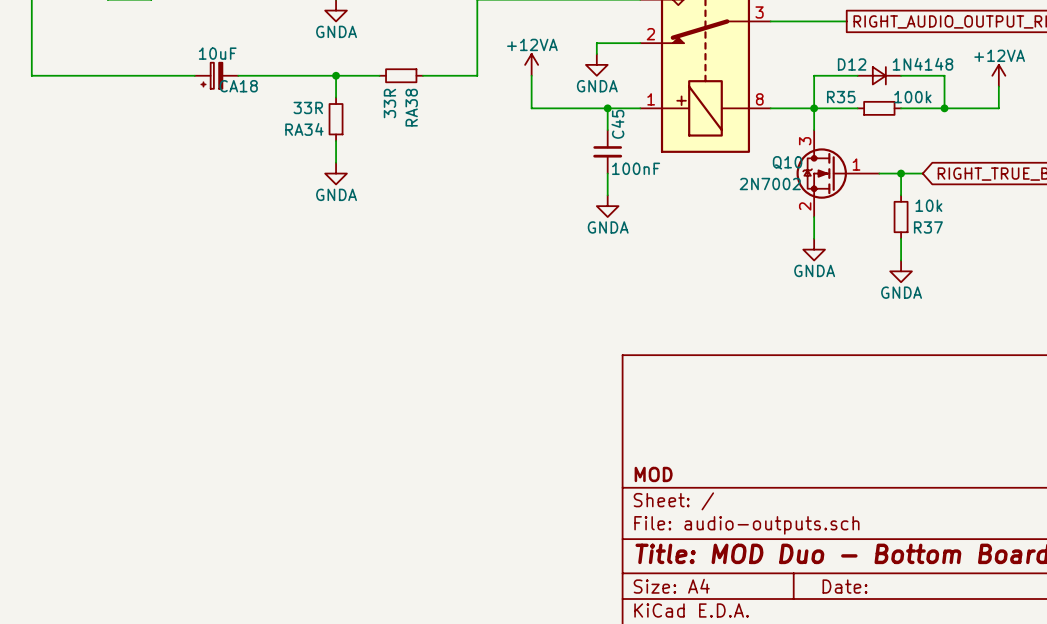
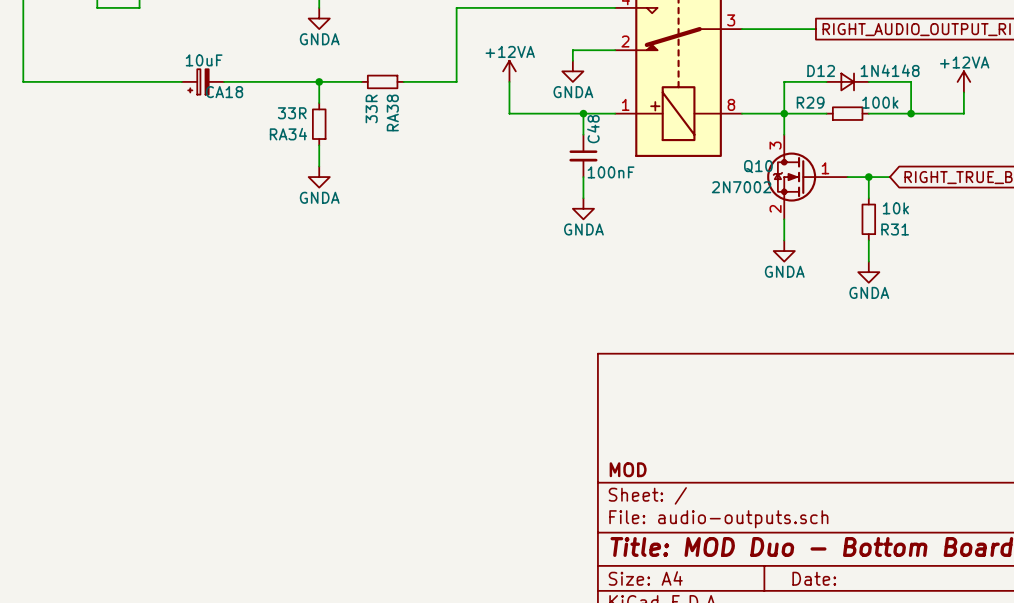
R35 name: R35 (841, 97) -> R29 (810, 102)
C45 name: C45 (617, 124) -> C48 (593, 129)
R37 name: R37 (928, 227) -> R31 (895, 229)

